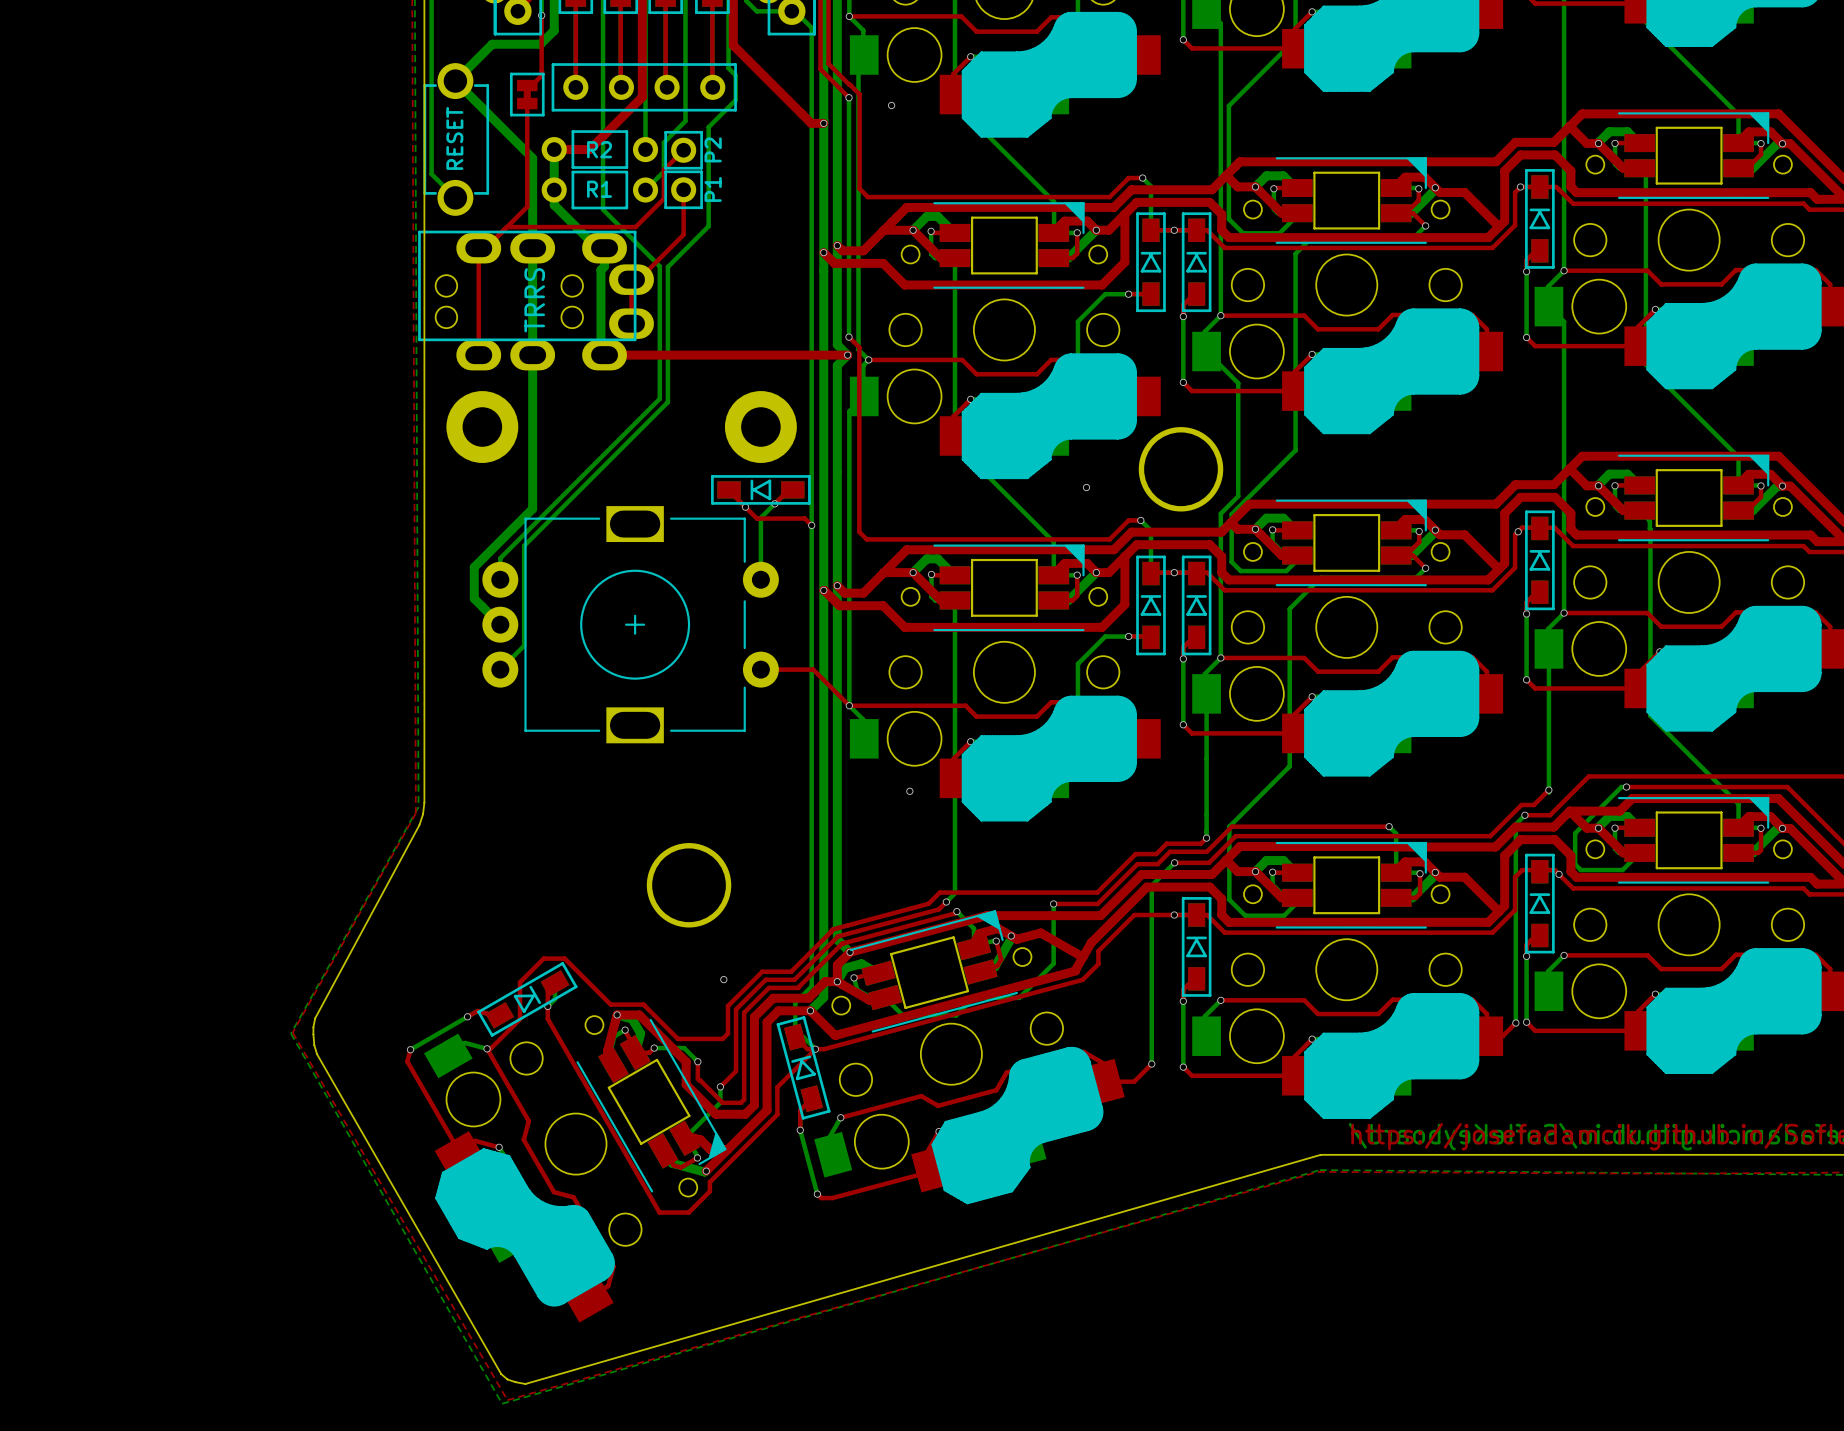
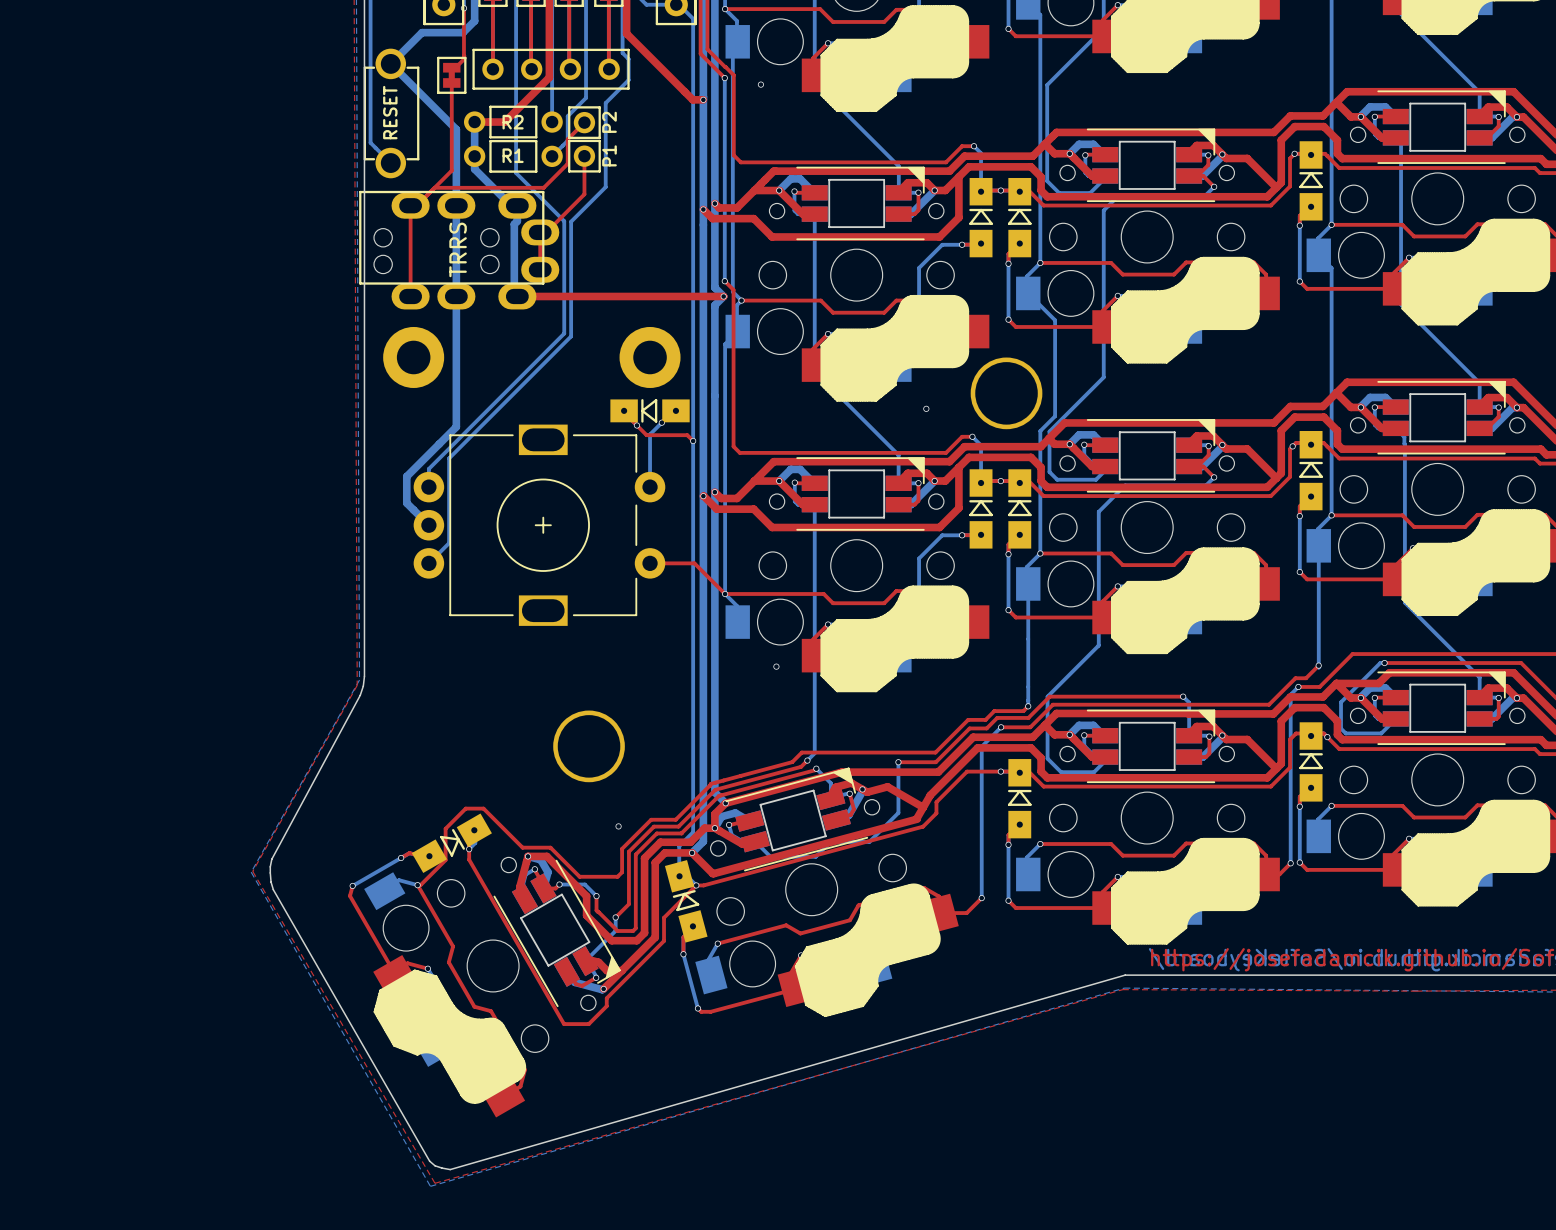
part footprint: [1525, 169, 1555, 269] -> [1299, 141, 1323, 221]
part footprint: [1136, 212, 1166, 313] -> [969, 177, 993, 258]
part footprint: [1181, 212, 1212, 313] -> [1007, 177, 1032, 258]
part footprint: [711, 475, 811, 505] -> [610, 399, 690, 423]
part footprint: [1525, 510, 1555, 611] -> [1299, 430, 1323, 511]
part footprint: [1136, 555, 1166, 656] -> [969, 469, 993, 549]
part footprint: [1181, 555, 1212, 656] -> [1007, 469, 1032, 549]
part footprint: [1525, 853, 1555, 954] -> [1299, 722, 1323, 802]
part footprint: [1181, 897, 1212, 997] -> [1007, 759, 1032, 839]
part footprint: [477, 962, 578, 1037] -> [411, 813, 492, 873]
part footprint: [776, 1016, 831, 1120] -> [664, 860, 708, 943]

